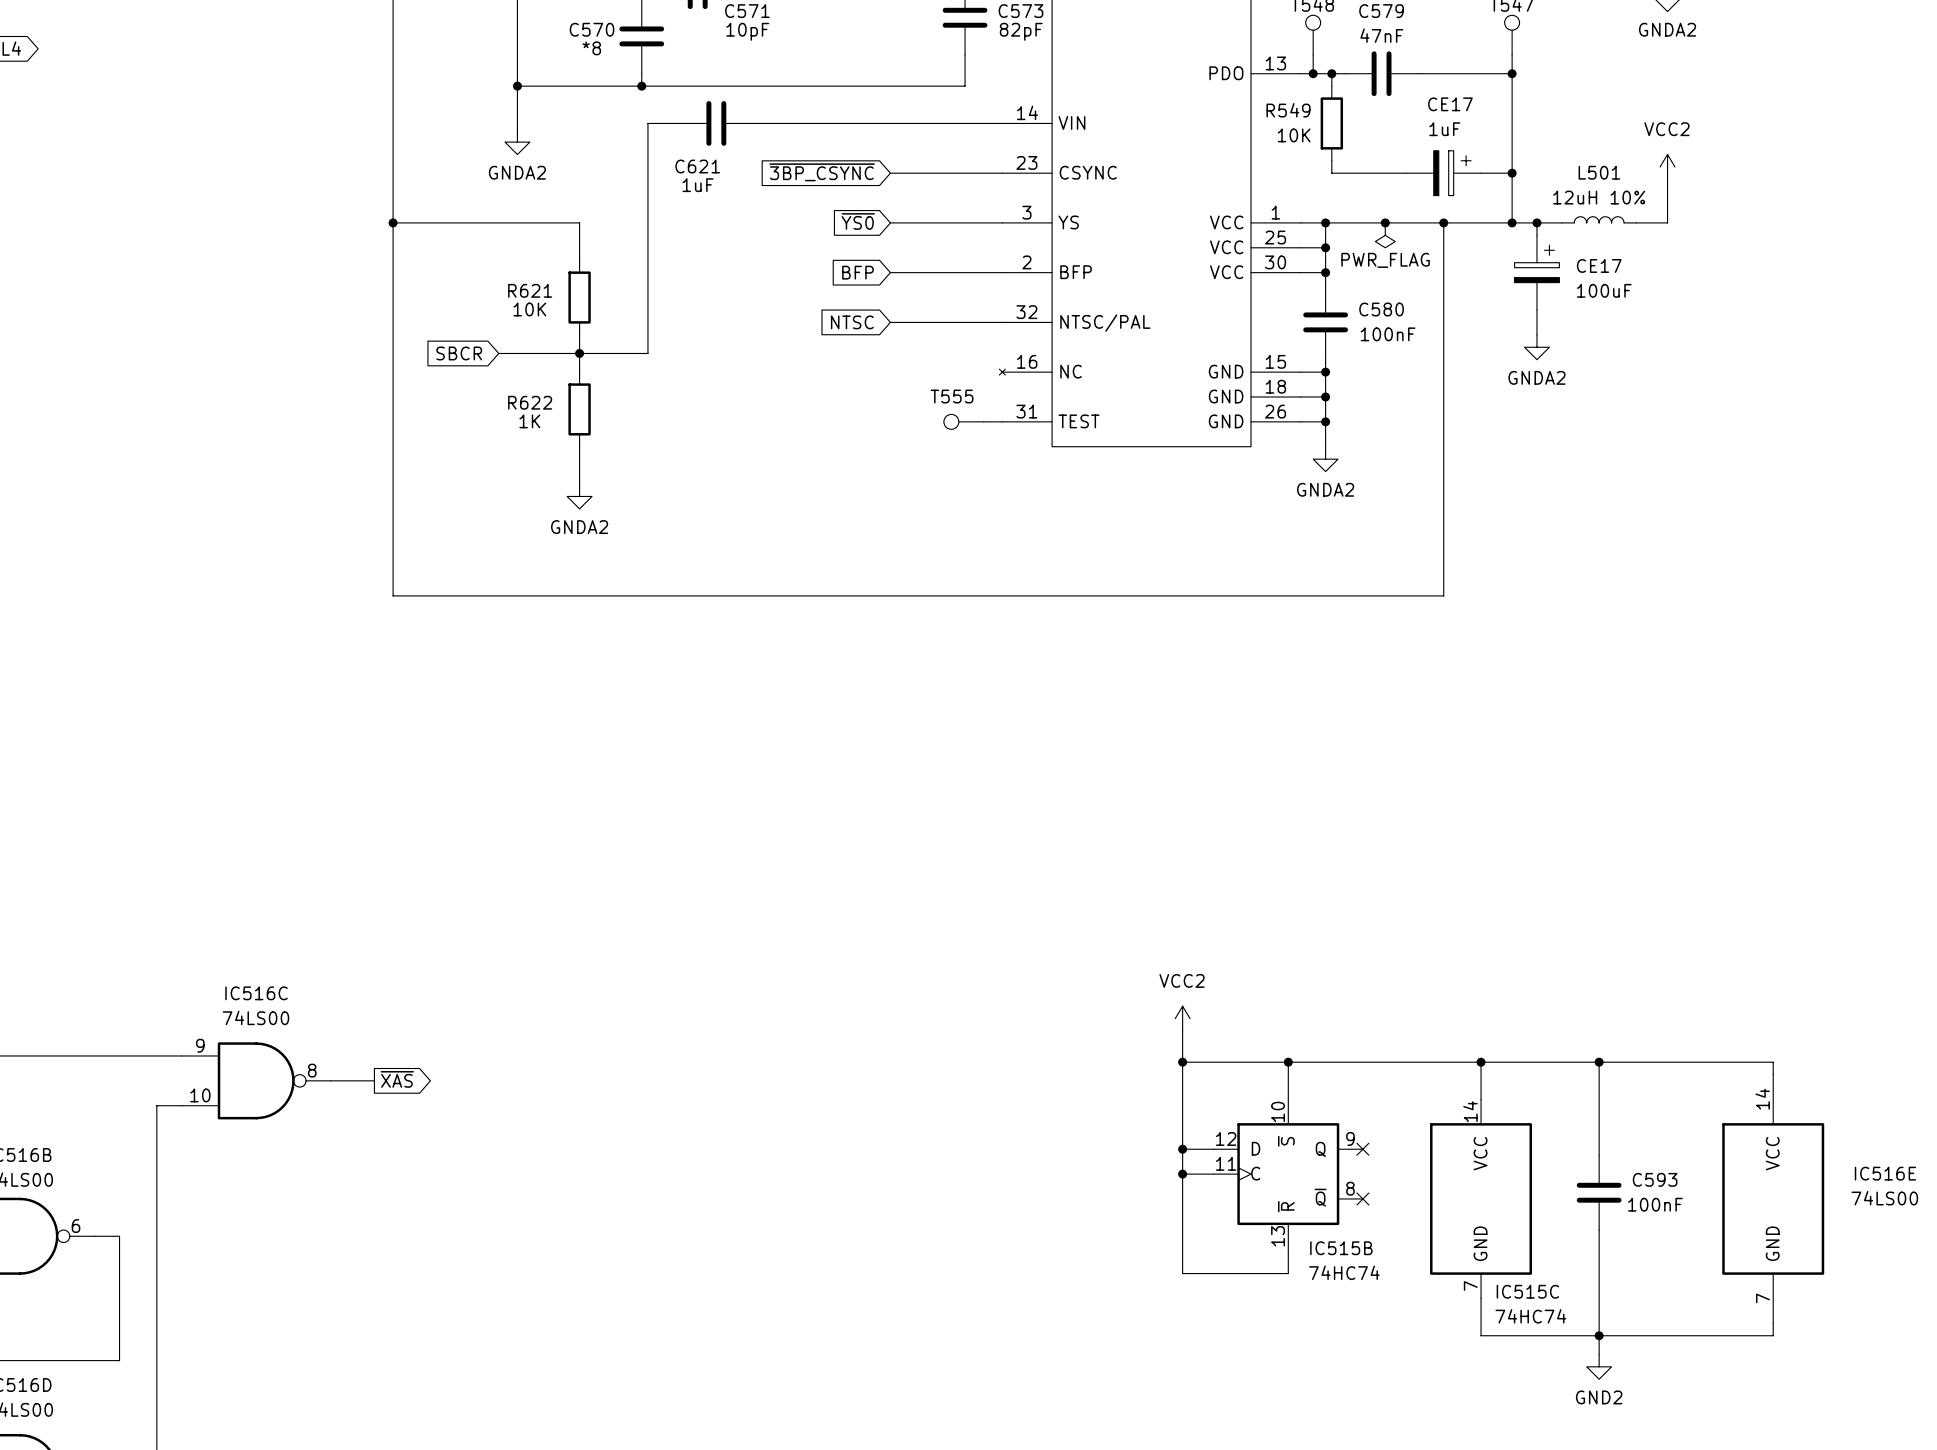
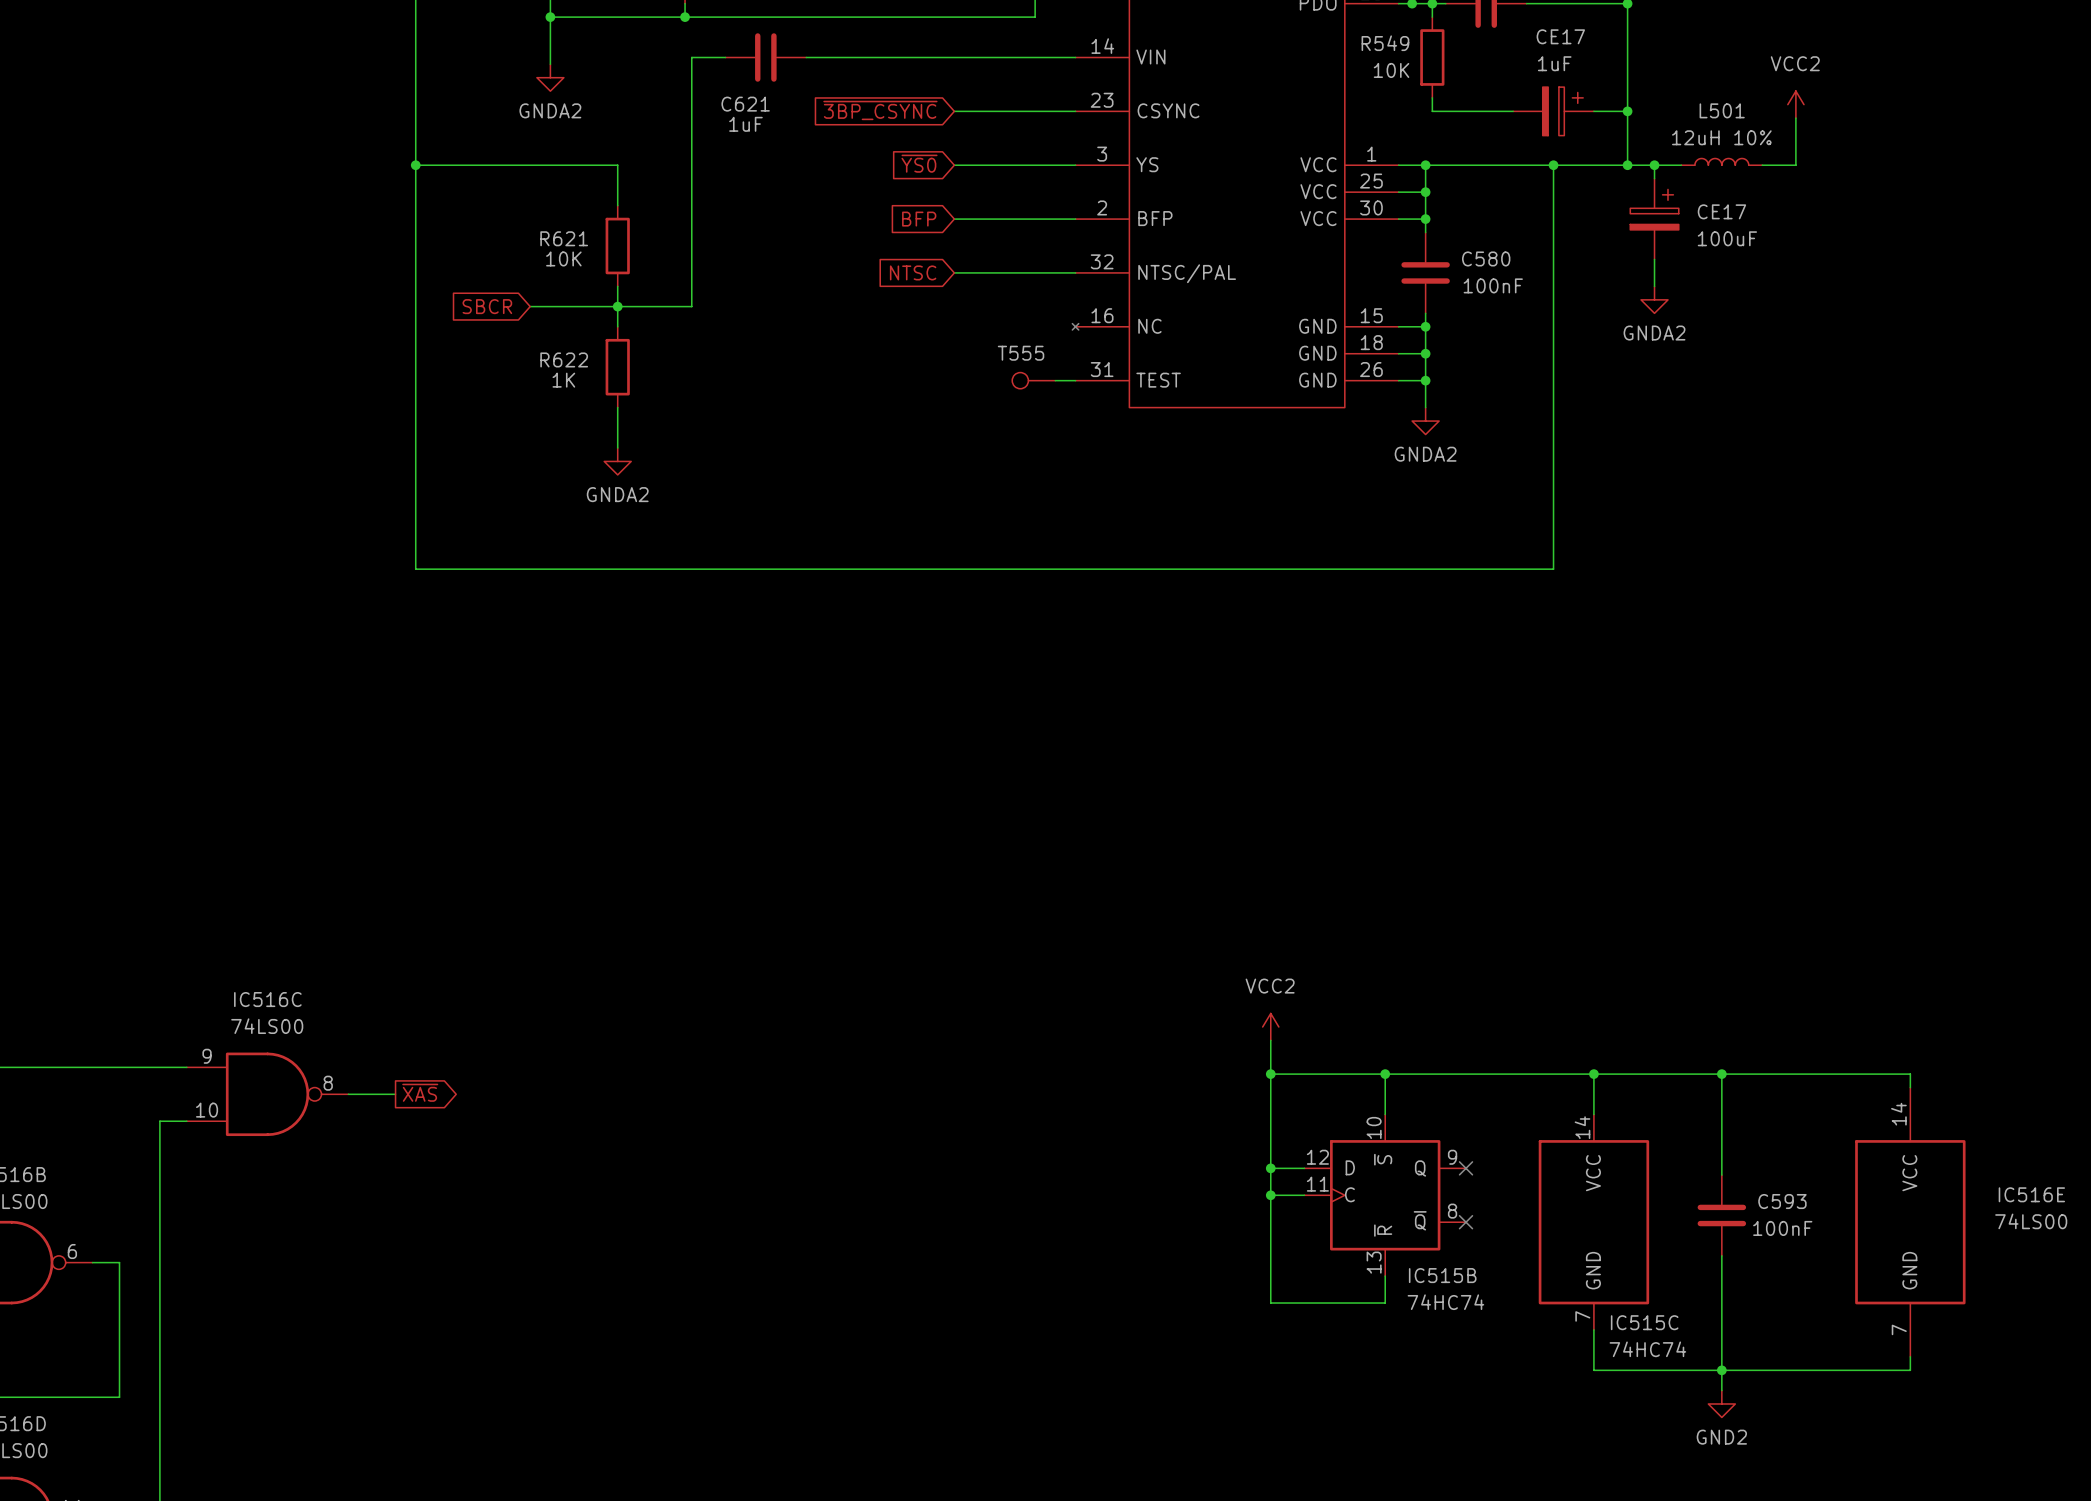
junction: (1385, 222) -> none
power symbol: PWR_FLAG (1385, 235) -> none

